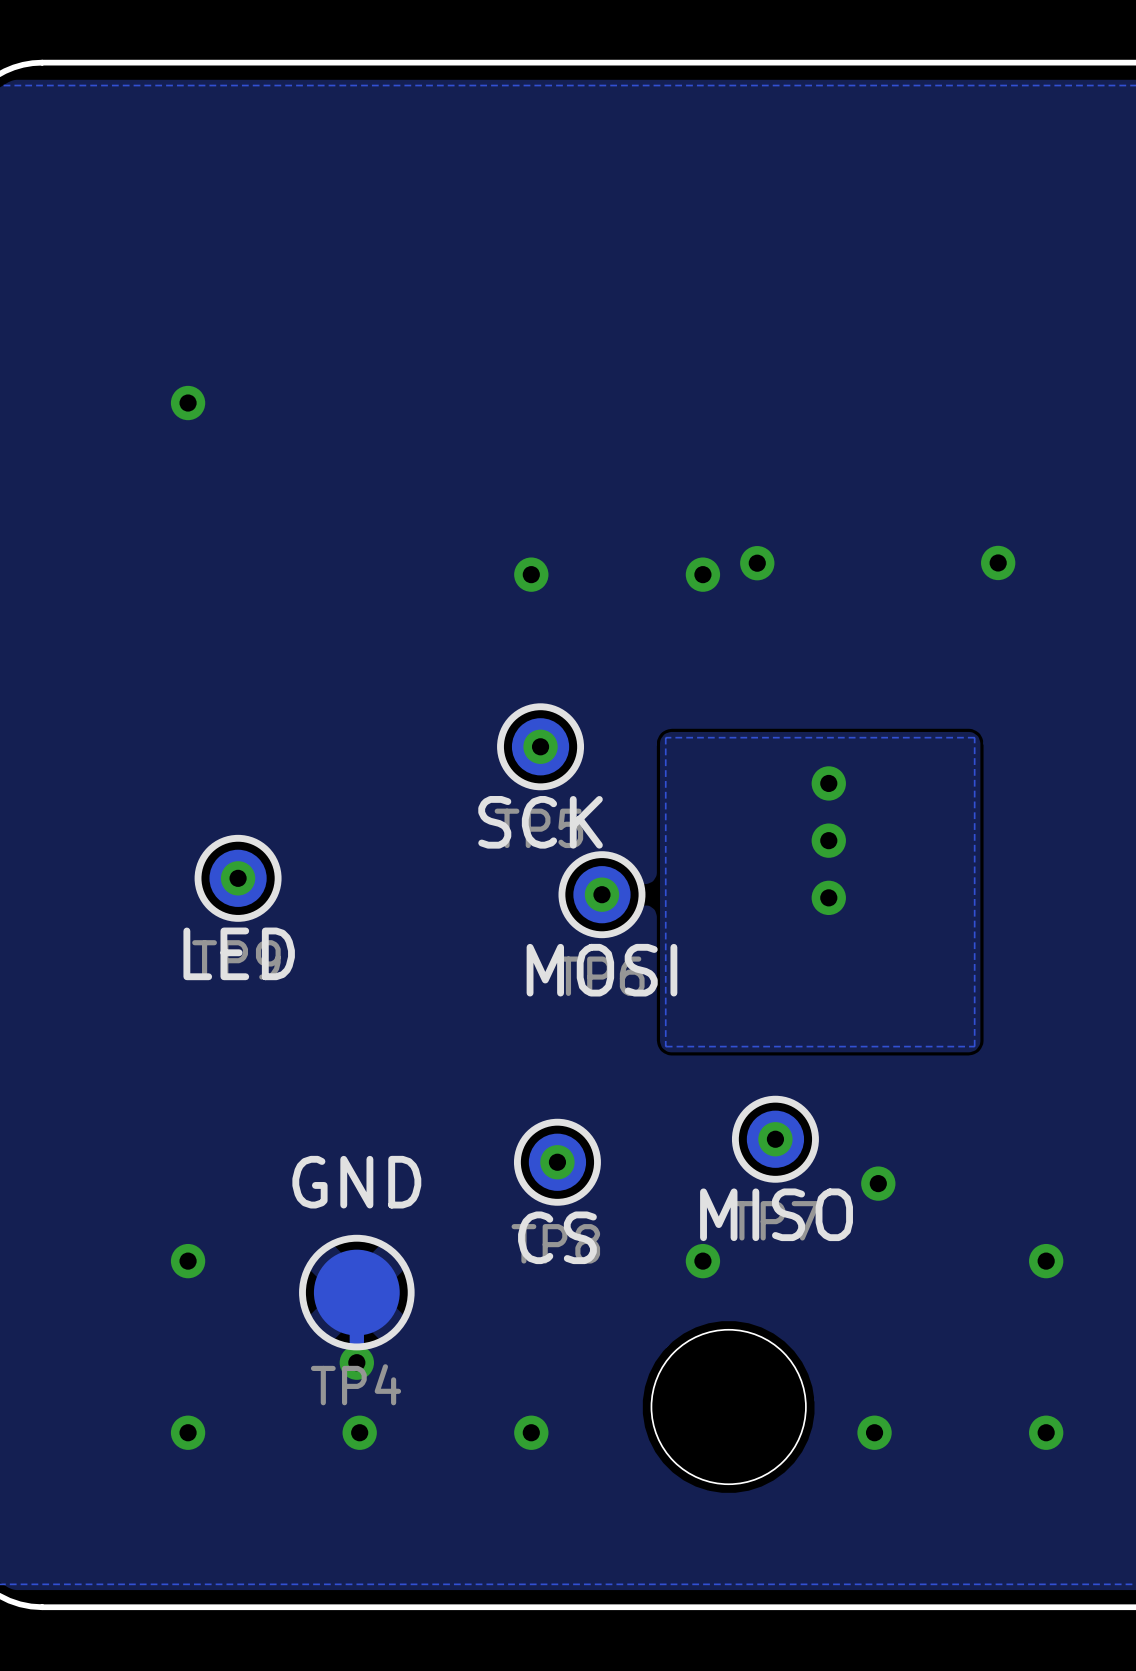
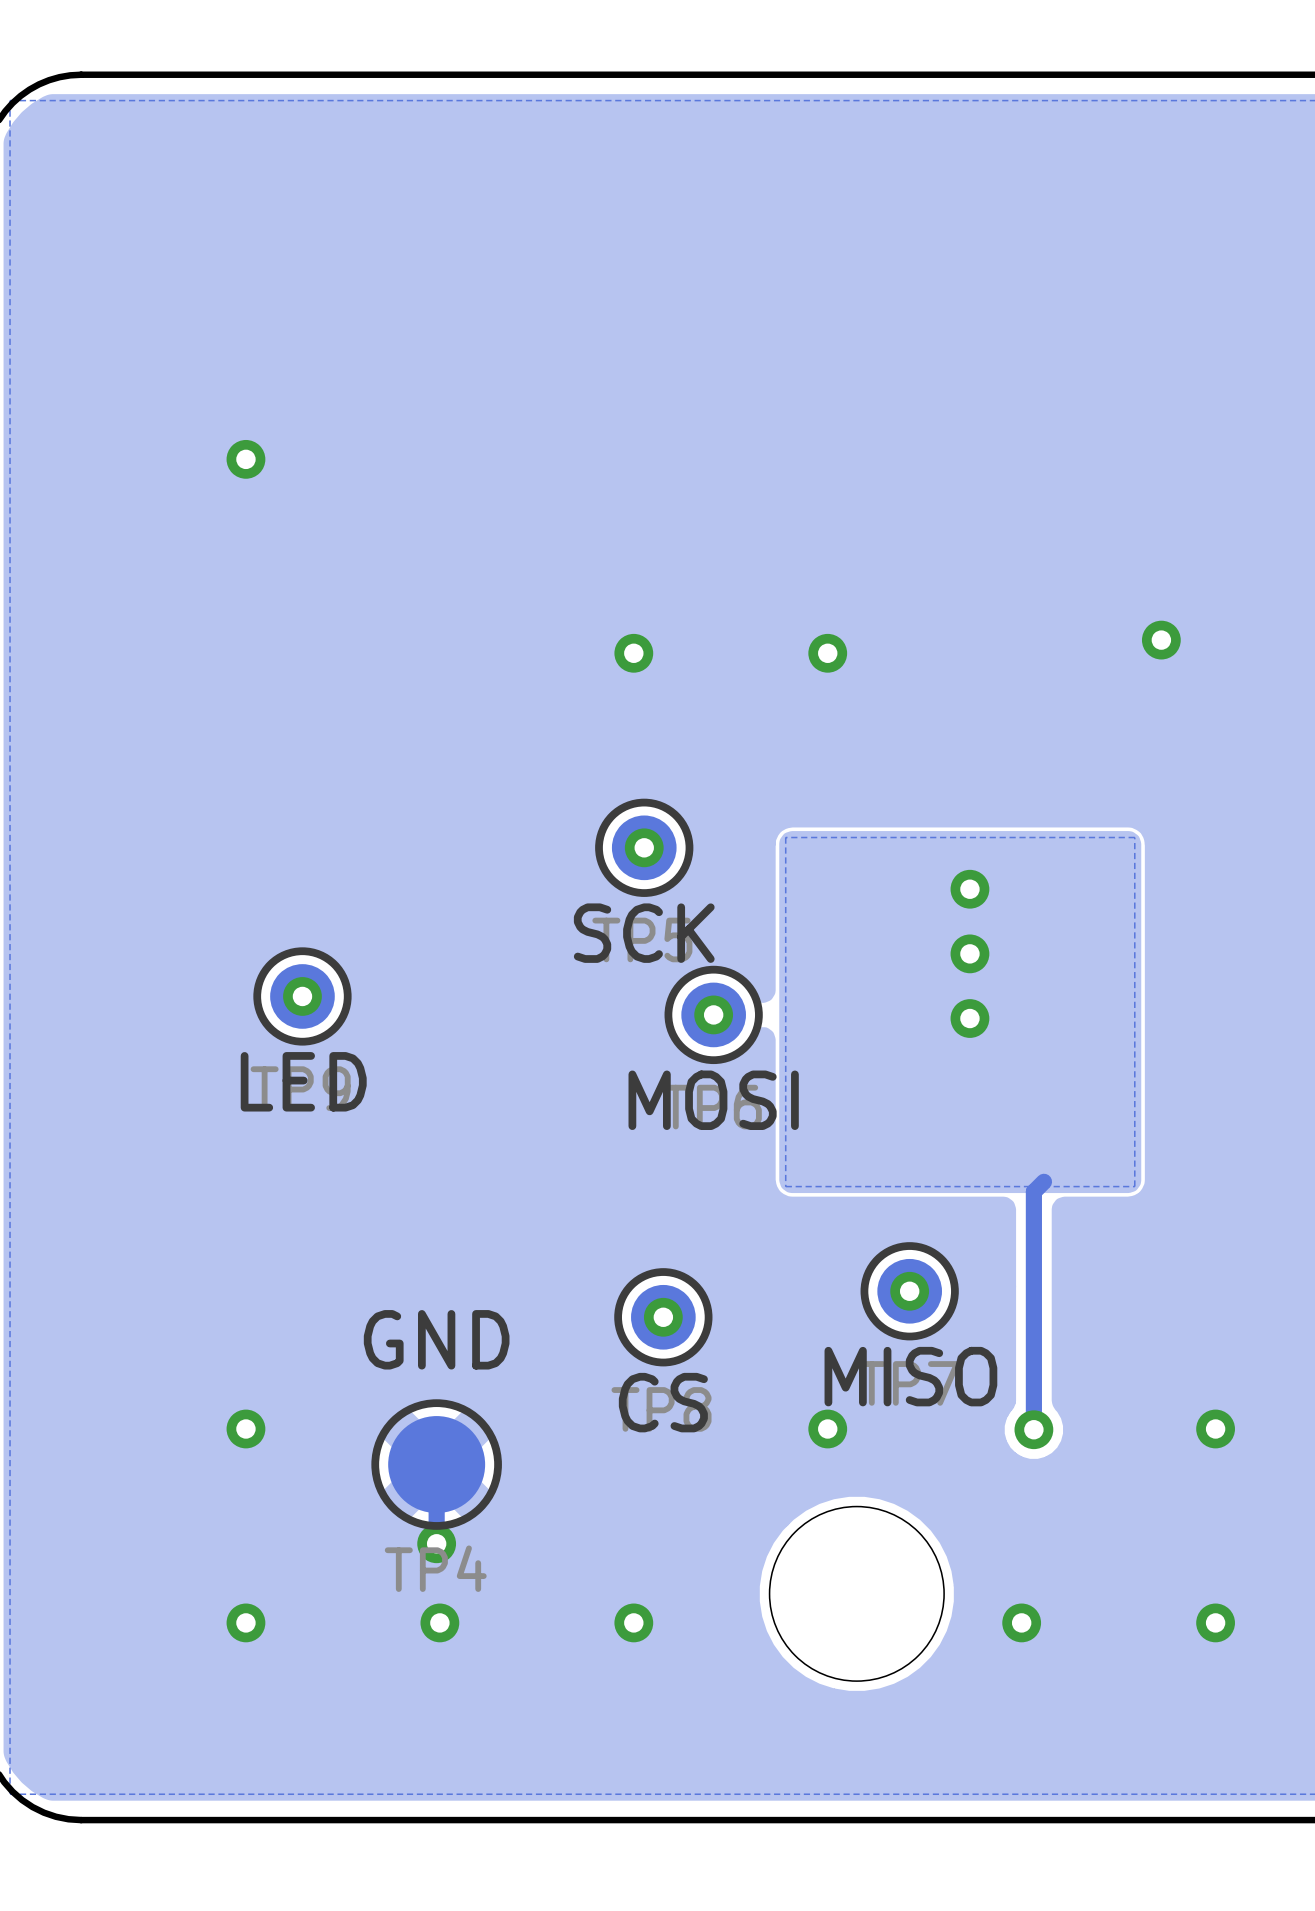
via: (757, 563) -> none
track: none -> (1043, 1181) (1033, 1191) (1033, 1429)
via position: (878, 1183) -> (1033, 1429)

